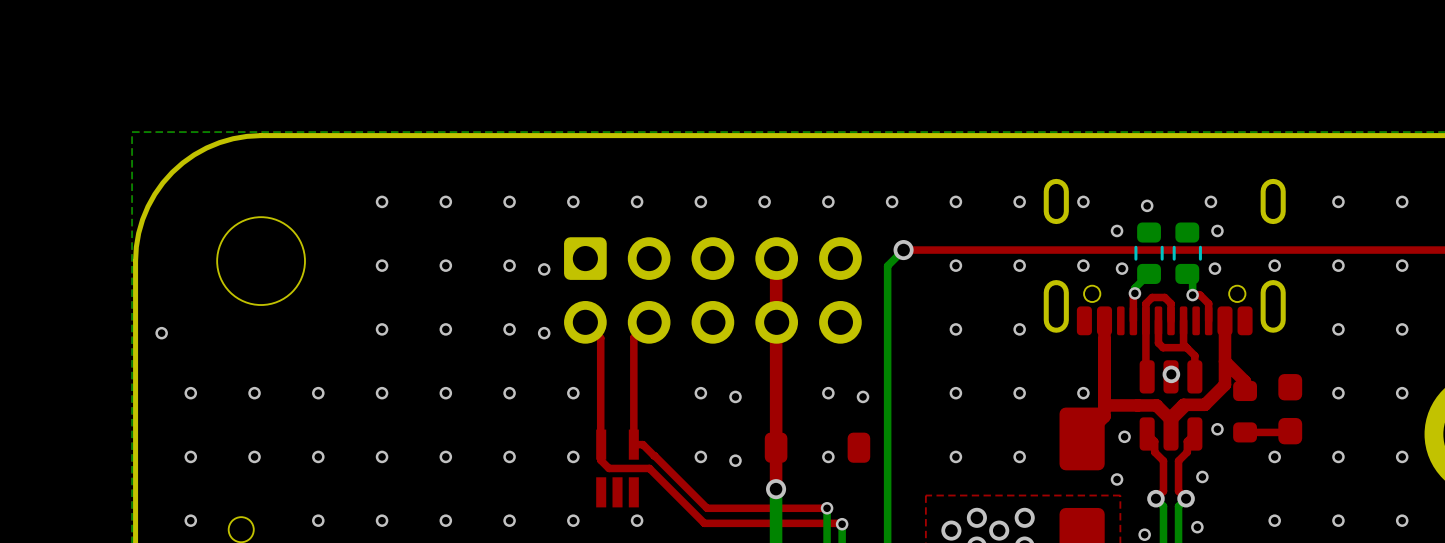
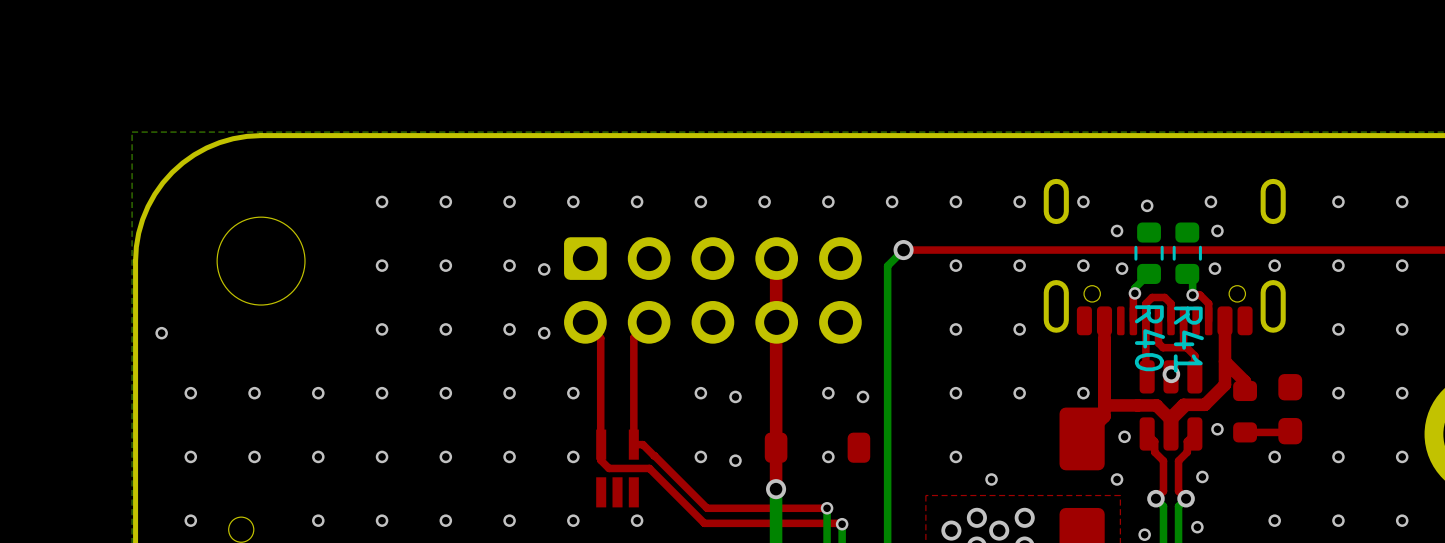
R40 name: none -> R40 (1149, 338)
R41 name: none -> R41 (1188, 339)
via position: (1019, 456) -> (991, 479)

